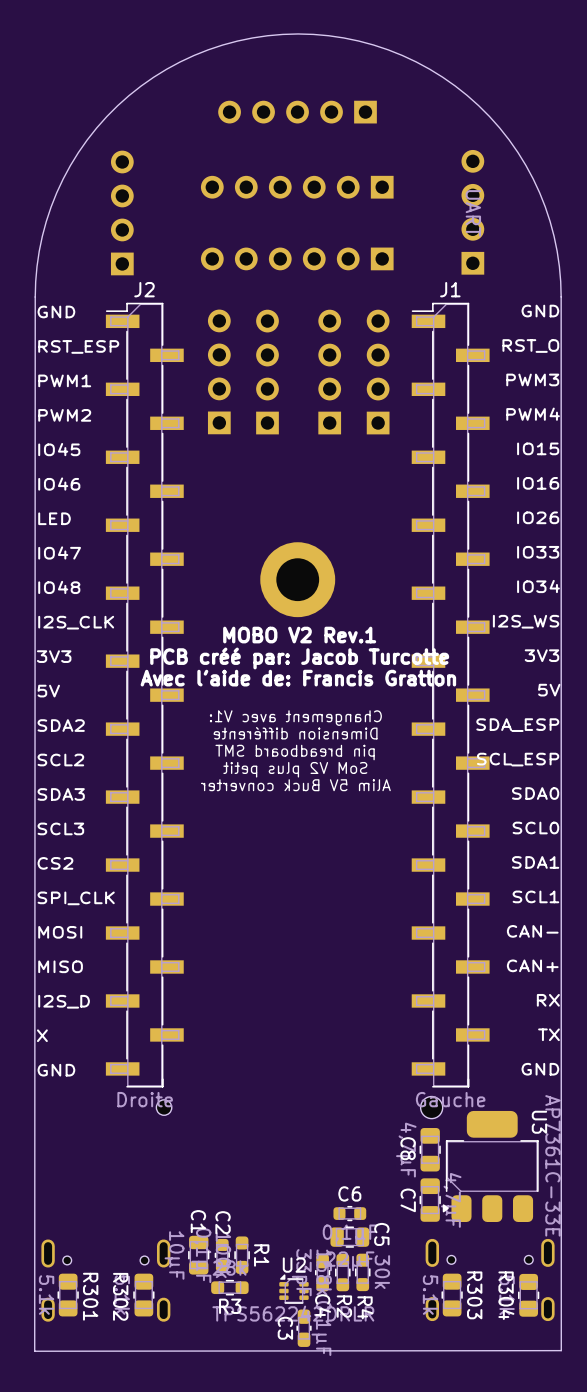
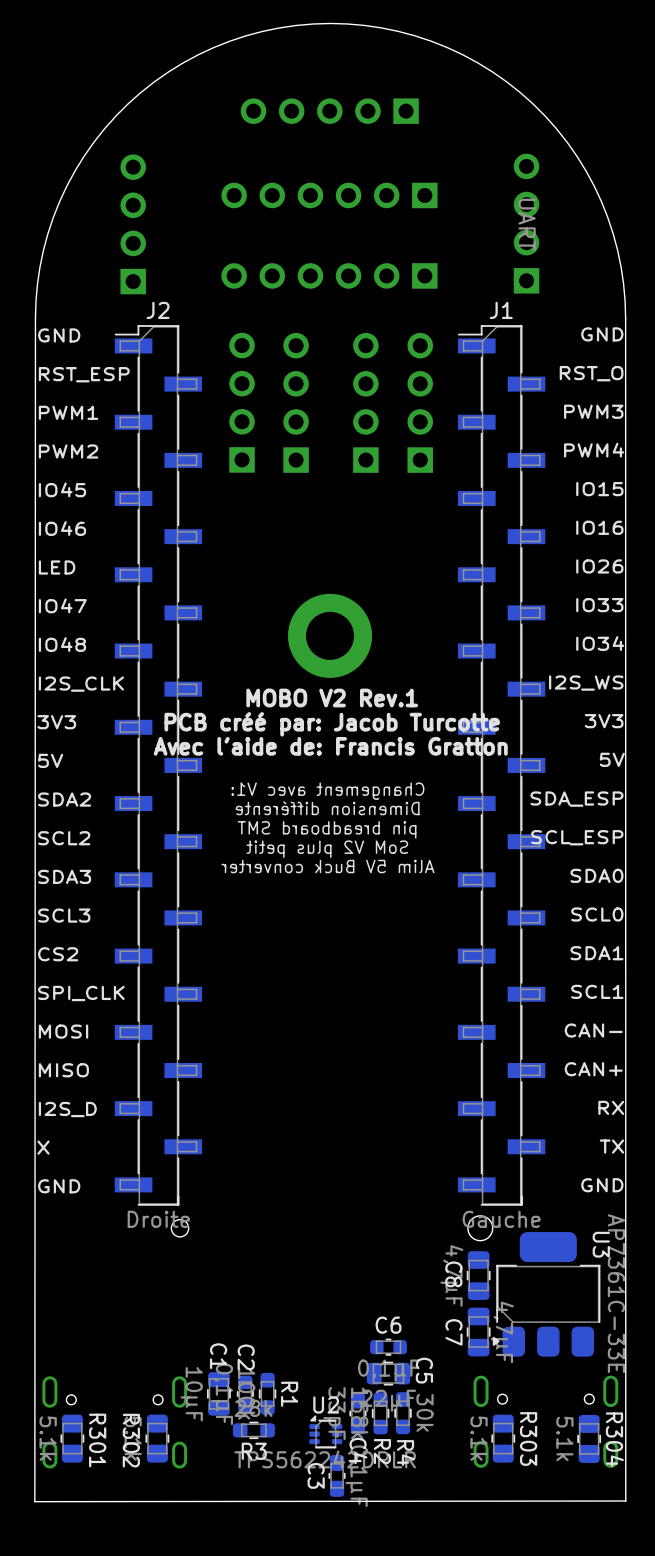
R304 name position: R304 (506, 1295) -> R304 (614, 1439)

